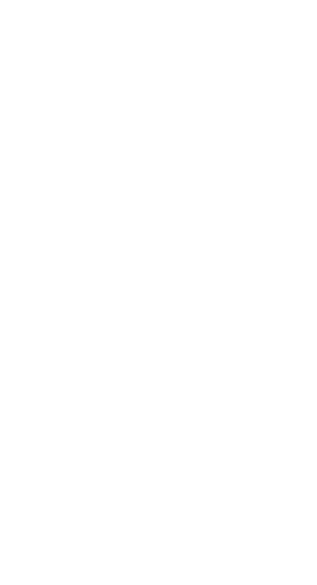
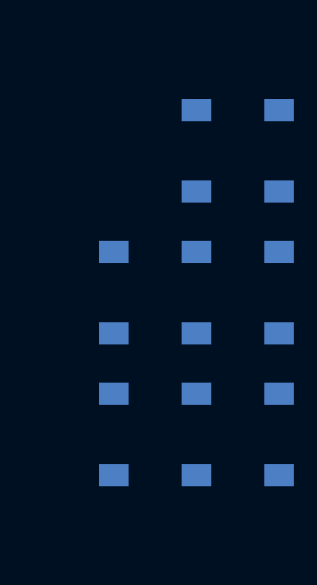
part: none -> (196, 150)
part: none -> (279, 150)
part: none -> (113, 292)
part: none -> (196, 292)
part: none -> (279, 292)
part: none -> (113, 434)
part: none -> (196, 434)
part: none -> (279, 434)

